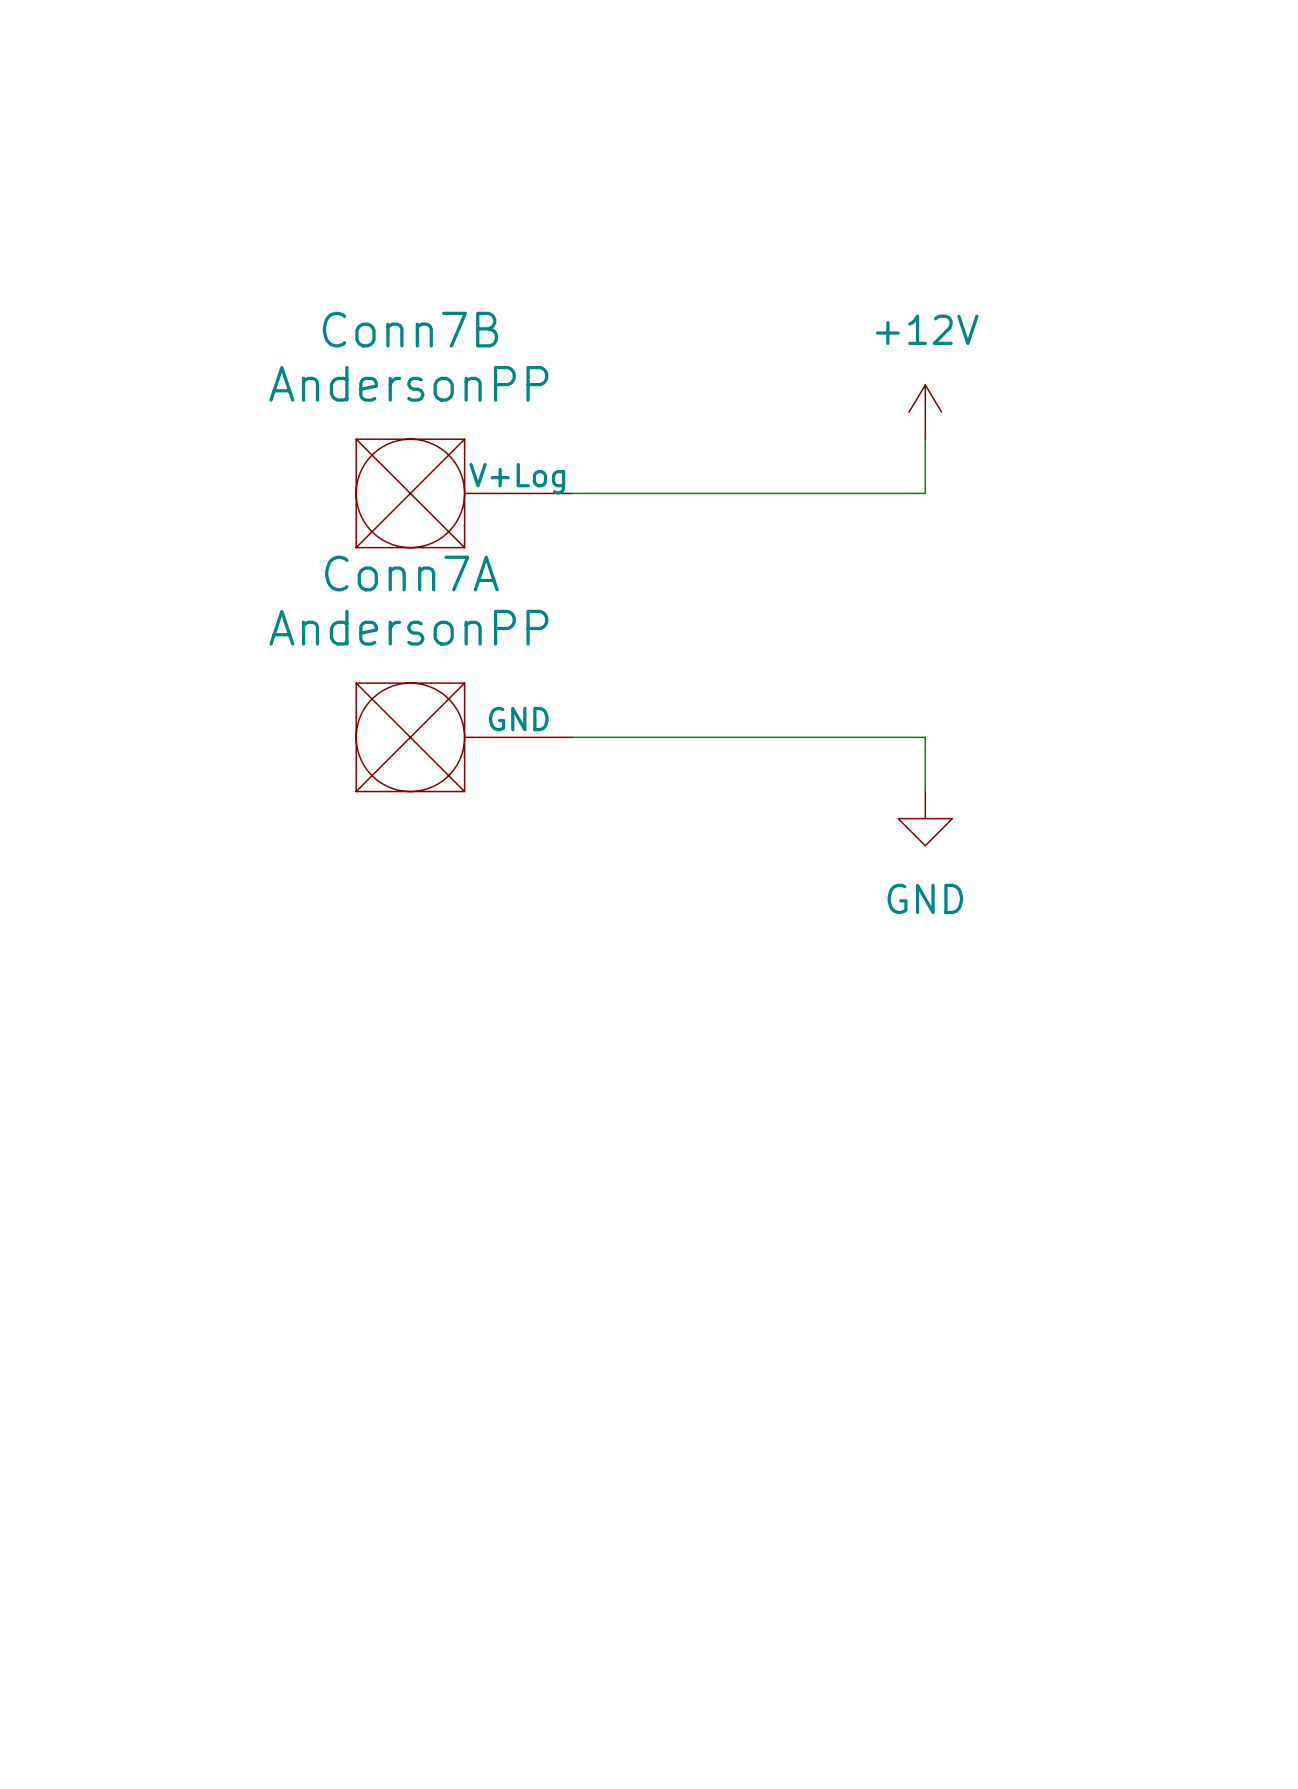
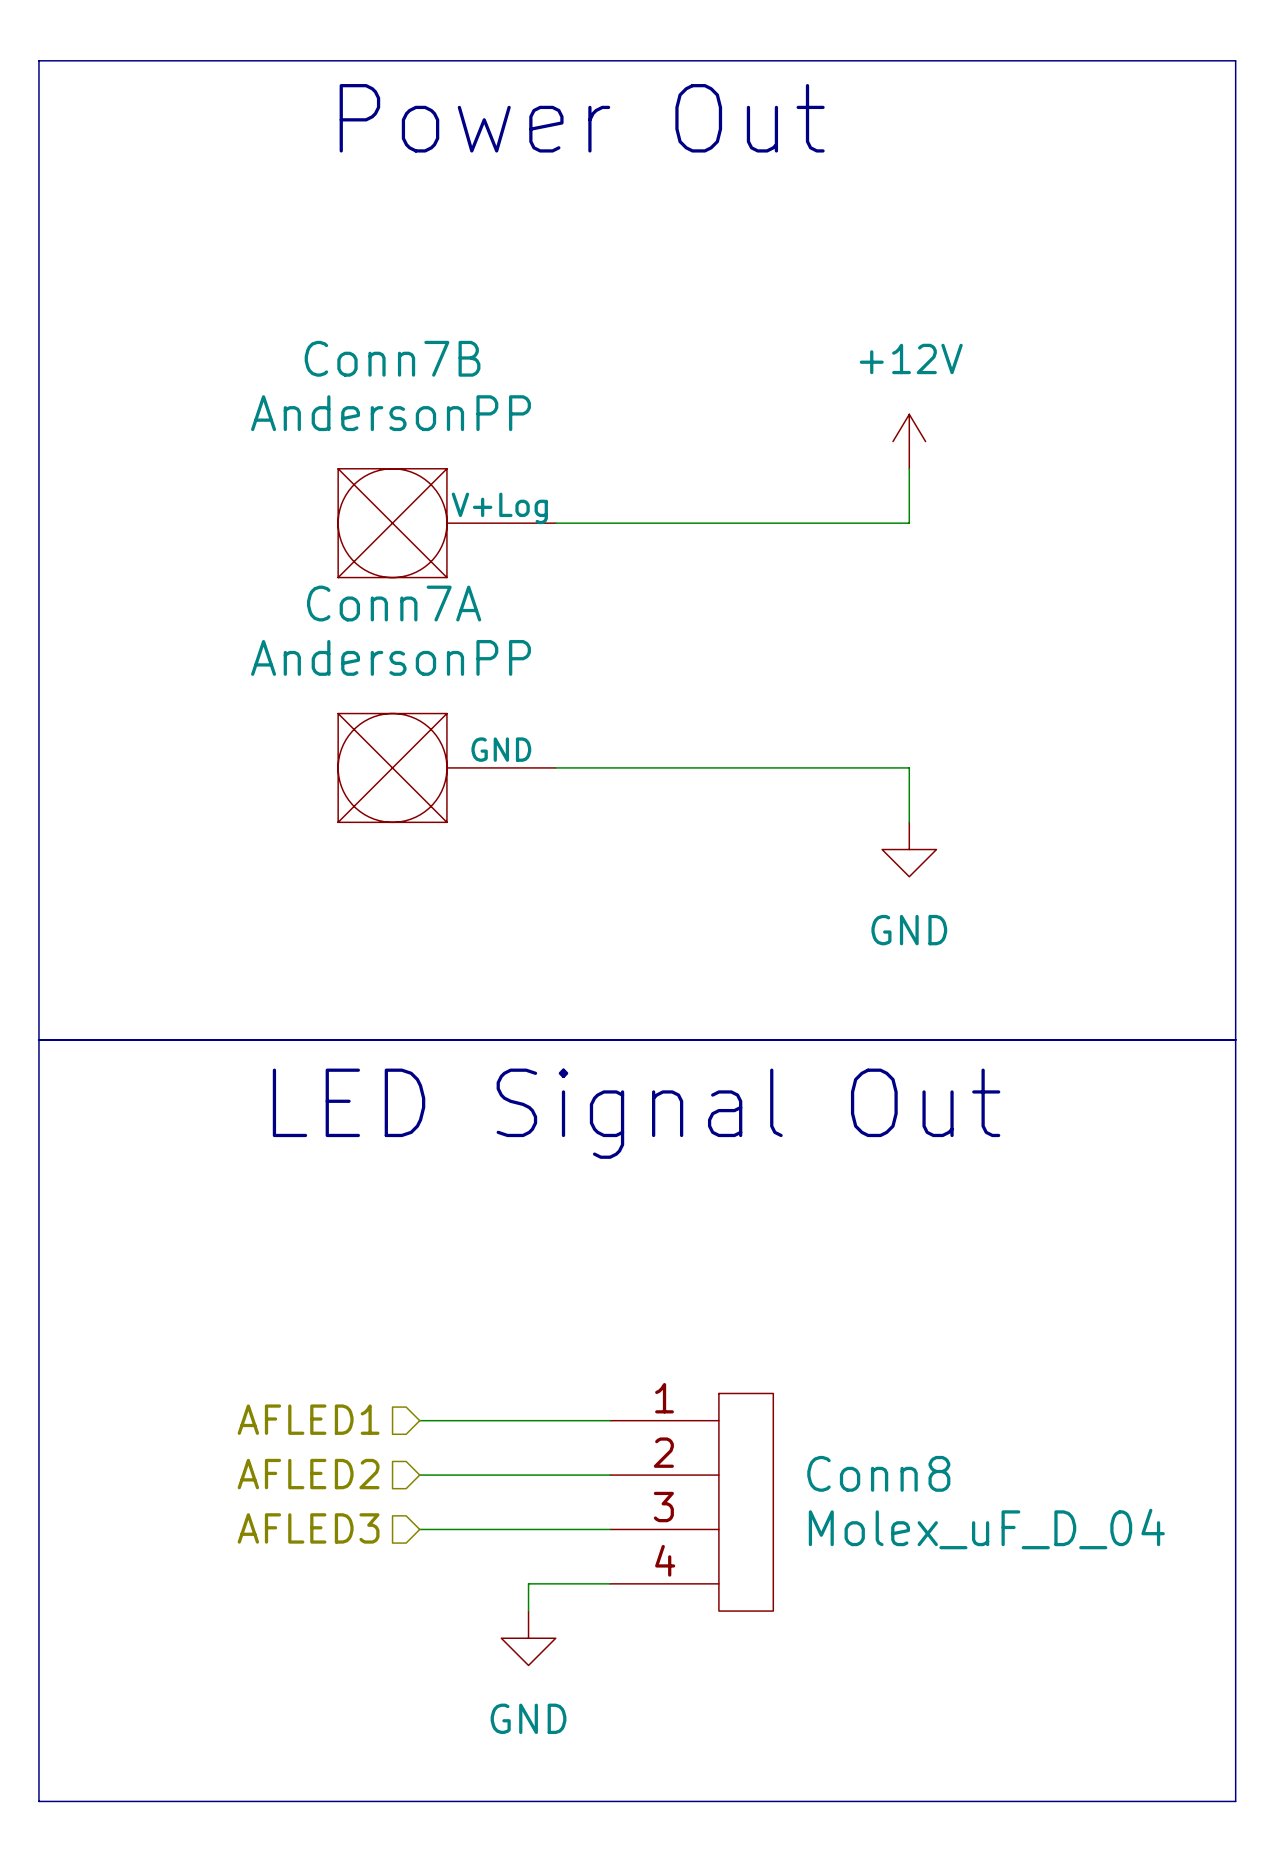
line: none -> (38, 60) (1235, 60) (1235, 1801) (38, 1801) (38, 60)
text: none -> Power Out (582, 118)
line: none -> (38, 1039) (1235, 1039)
text: none -> LED Signal Out (636, 1113)
hierarchical label: none -> AFLED1 (308, 1419)
wire: none -> (419, 1420) (610, 1420)
hierarchical label: none -> AFLED2 (308, 1474)
wire: none -> (419, 1475) (610, 1475)
Conn8: none -> Molex_uF_D_04 (691, 1502)
hierarchical label: none -> AFLED3 (308, 1528)
wire: none -> (419, 1529) (610, 1529)
wire: none -> (610, 1583) (528, 1583) (528, 1611)
power symbol: none -> GND (528, 1638)

